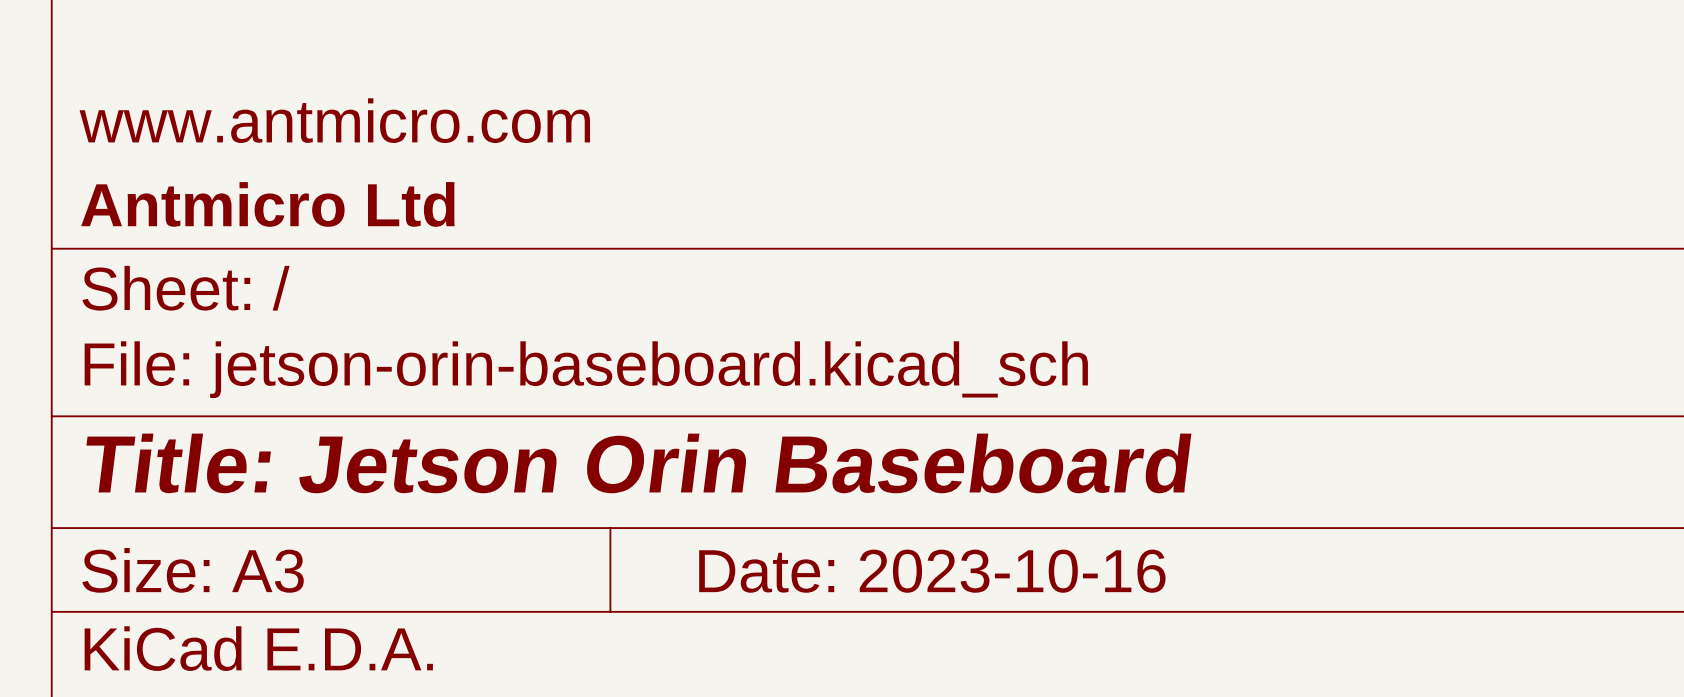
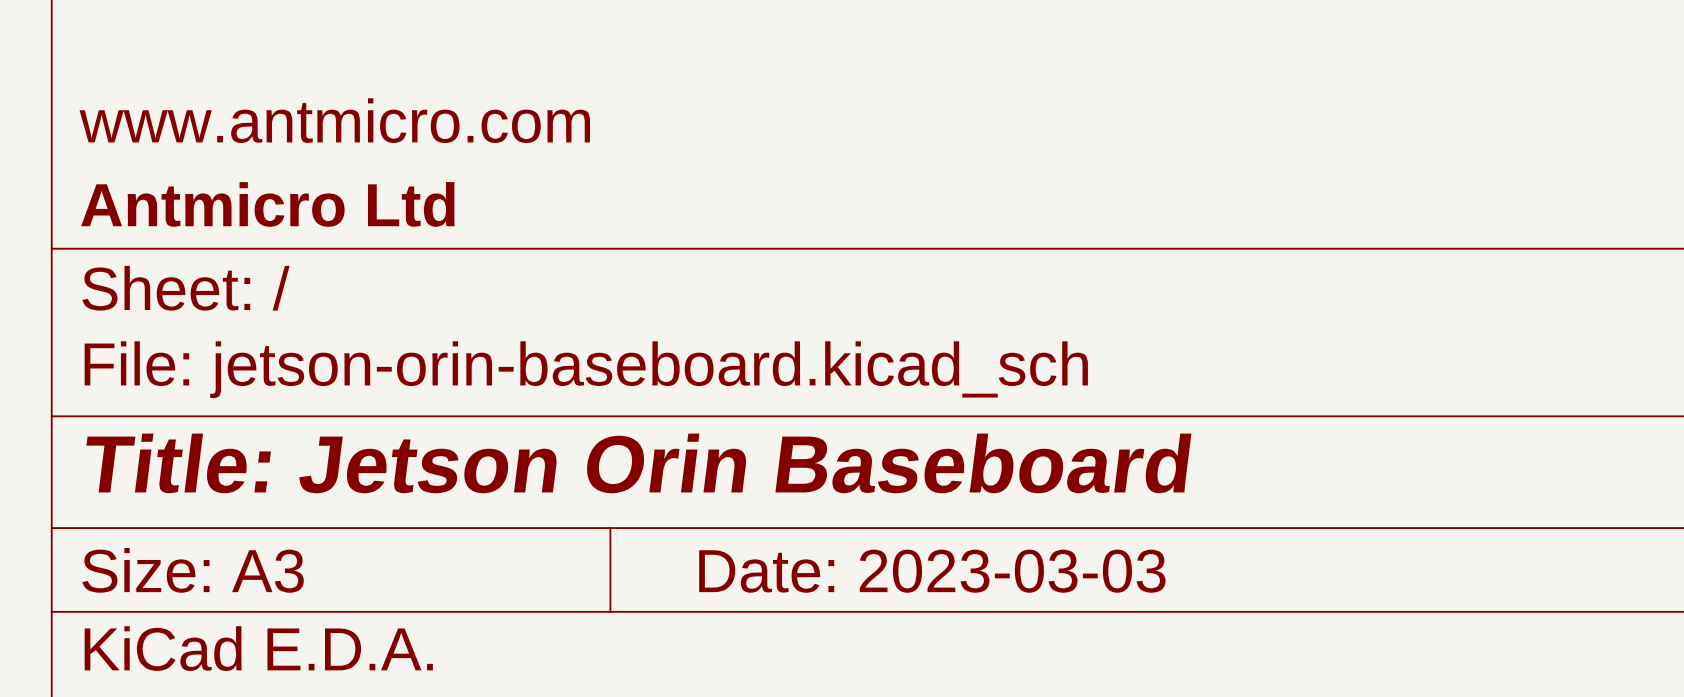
title block: Date: 2023-10-16 (932, 571) -> Date: 2023-03-03 (932, 571)

